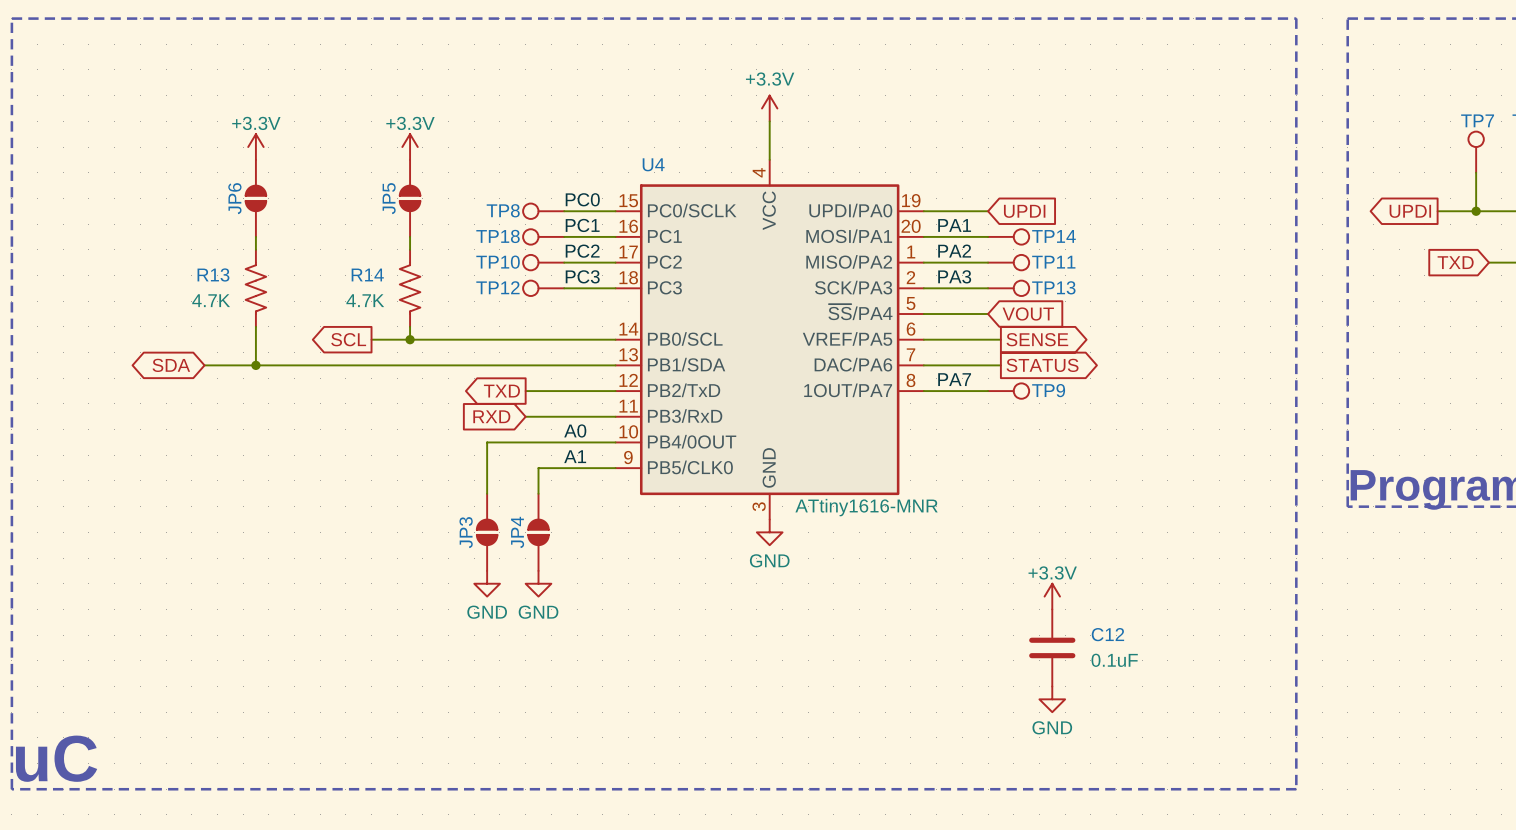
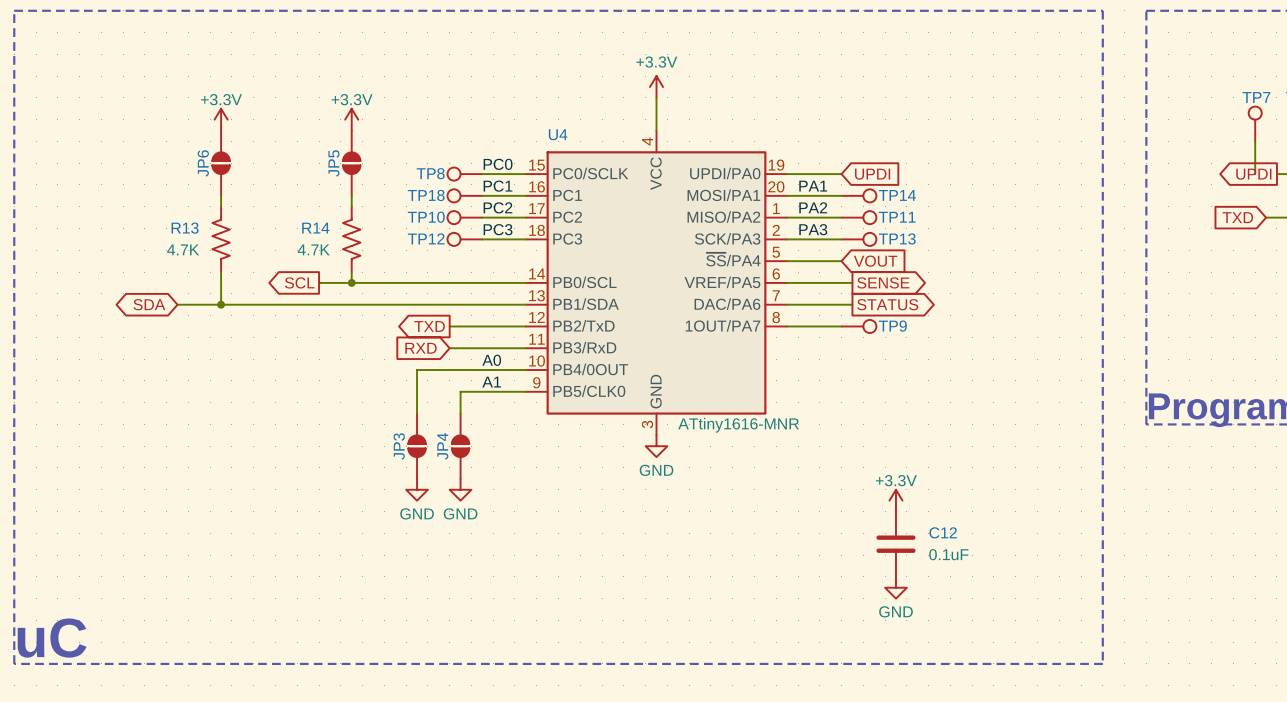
global label position: UPDI (1410, 211) -> UPDI (1253, 174)
wire: (1437, 211) (1501, 211) -> none
junction: (1476, 211) -> none
label: PA7 (954, 379) -> none

